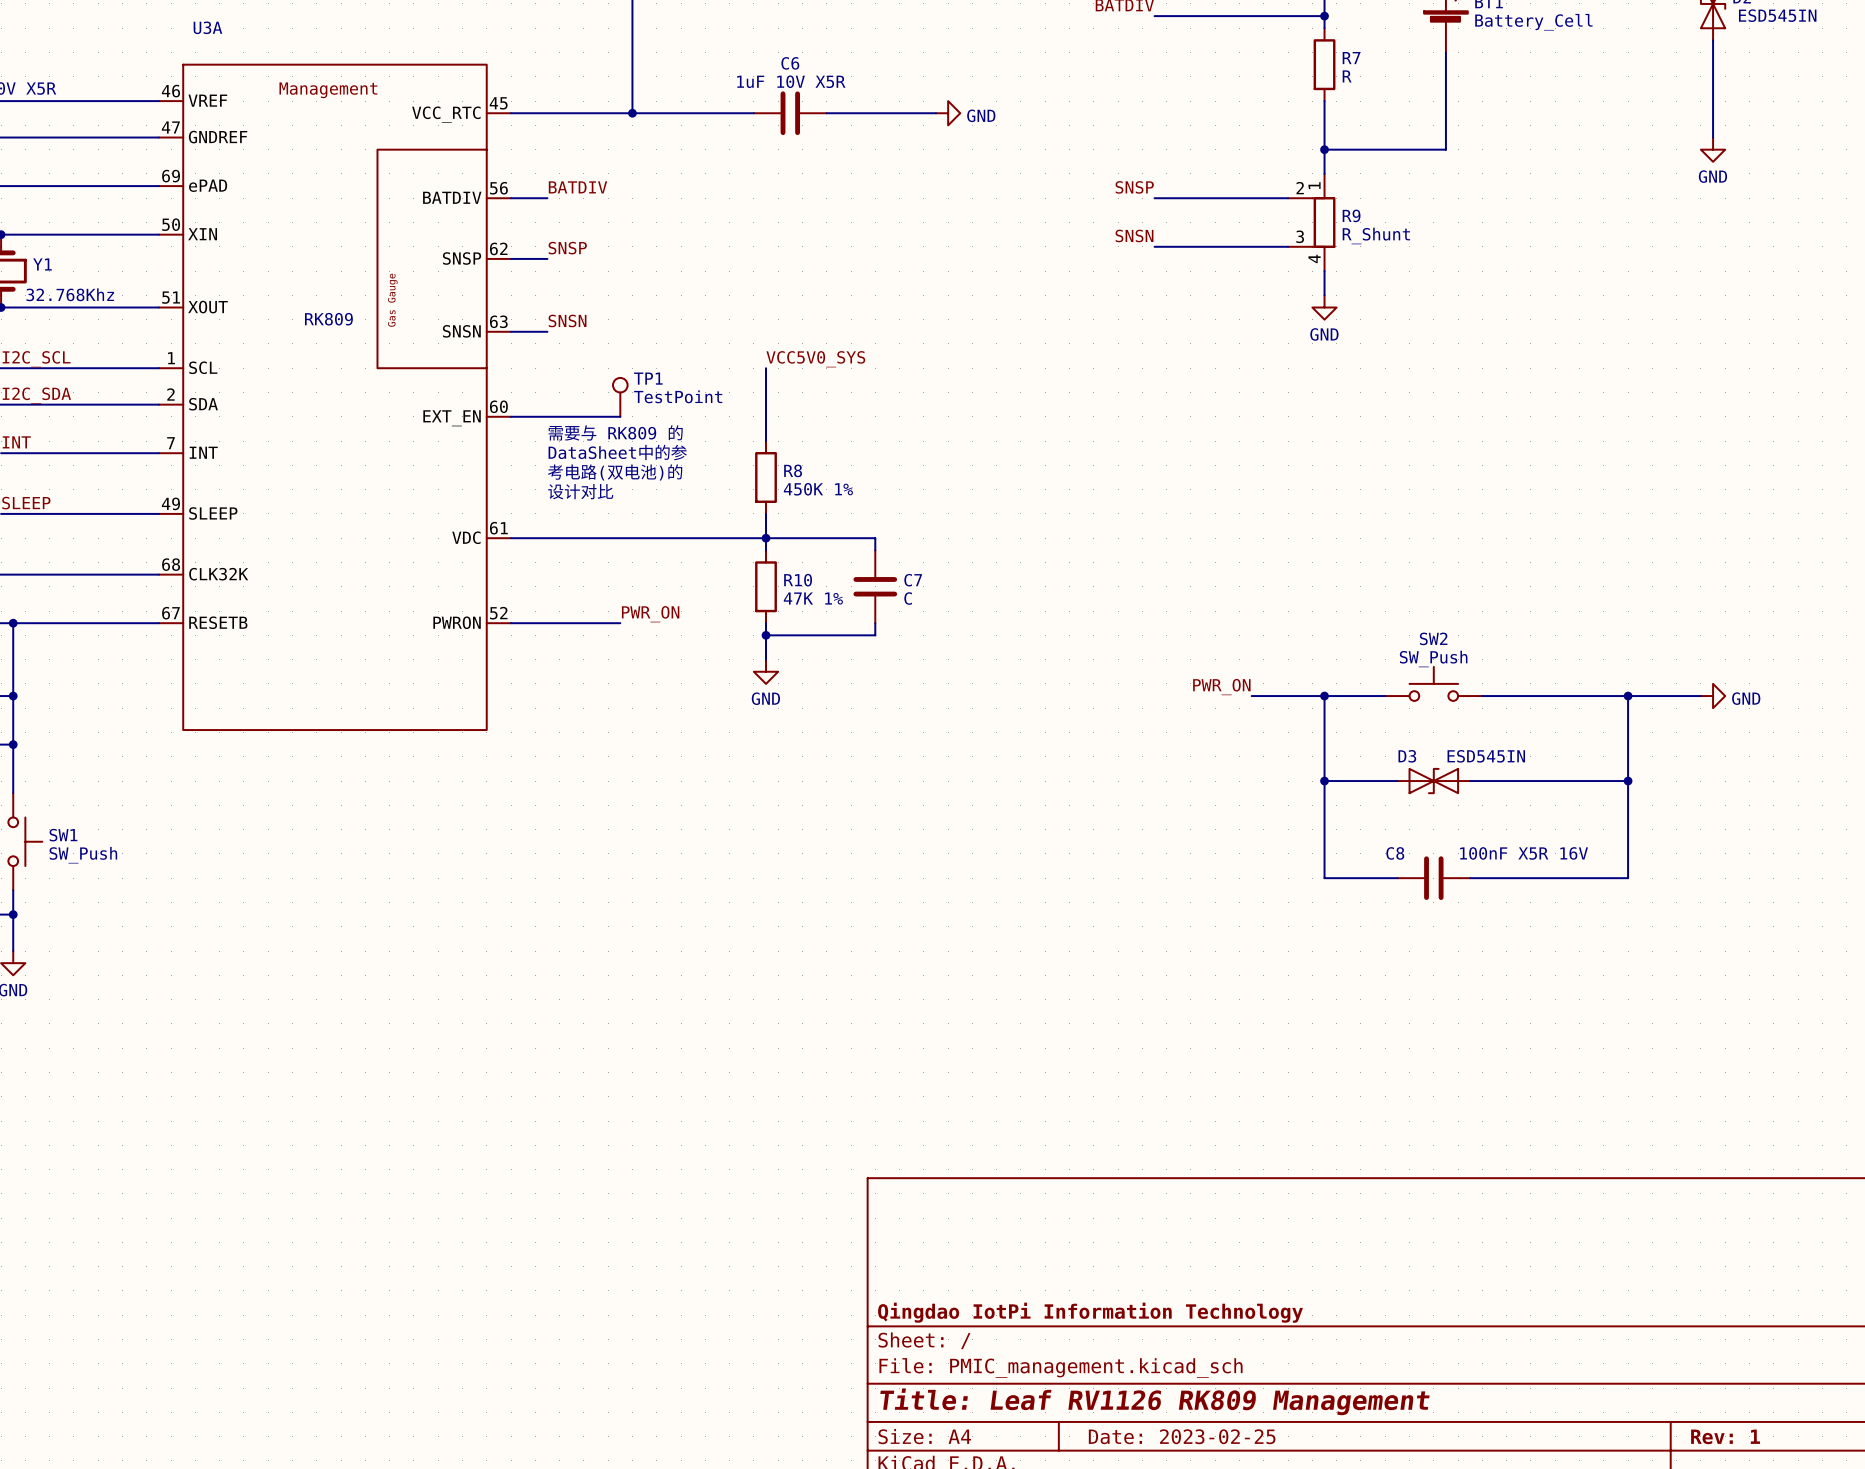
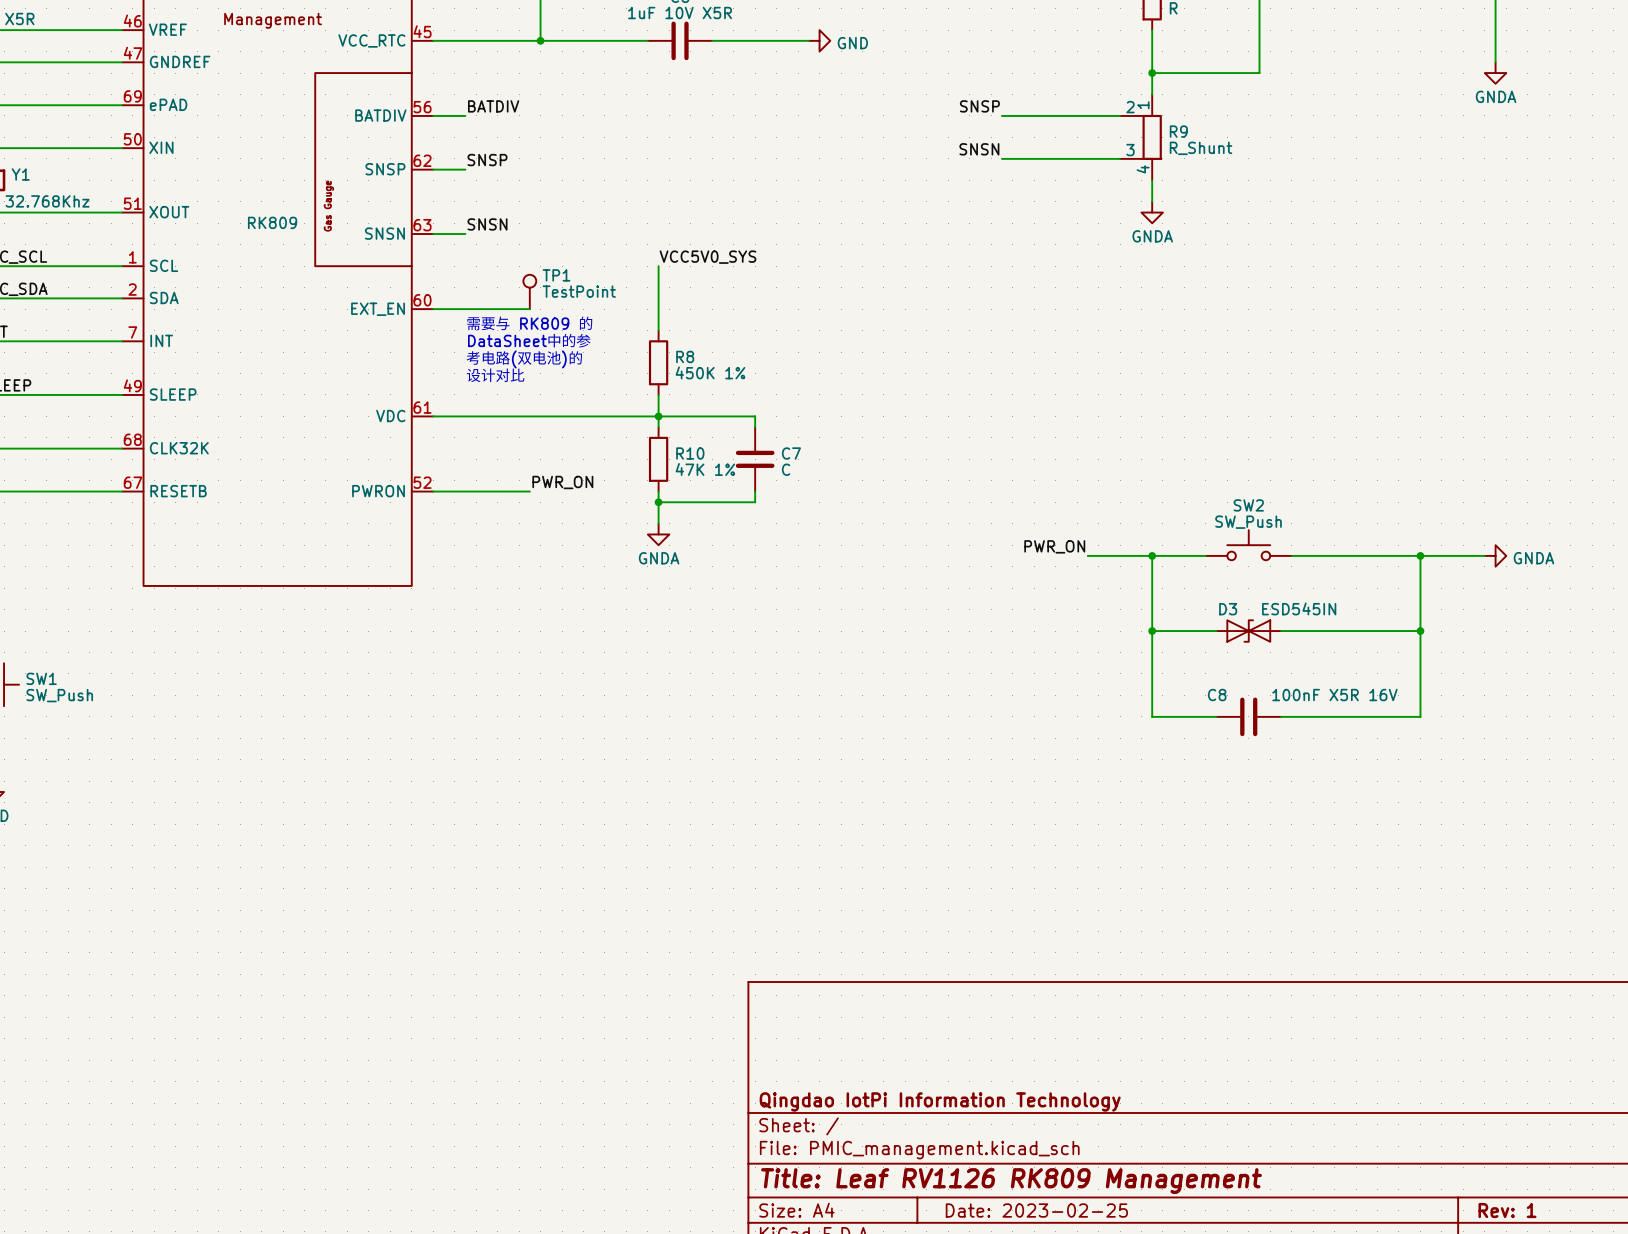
power symbol: GND (1713, 149) -> GNDA (1495, 73)
power symbol: GND (1324, 307) -> GNDA (1152, 212)
power symbol: GND (766, 671) -> GNDA (658, 534)
power symbol: GND (1713, 696) -> GNDA (1495, 555)

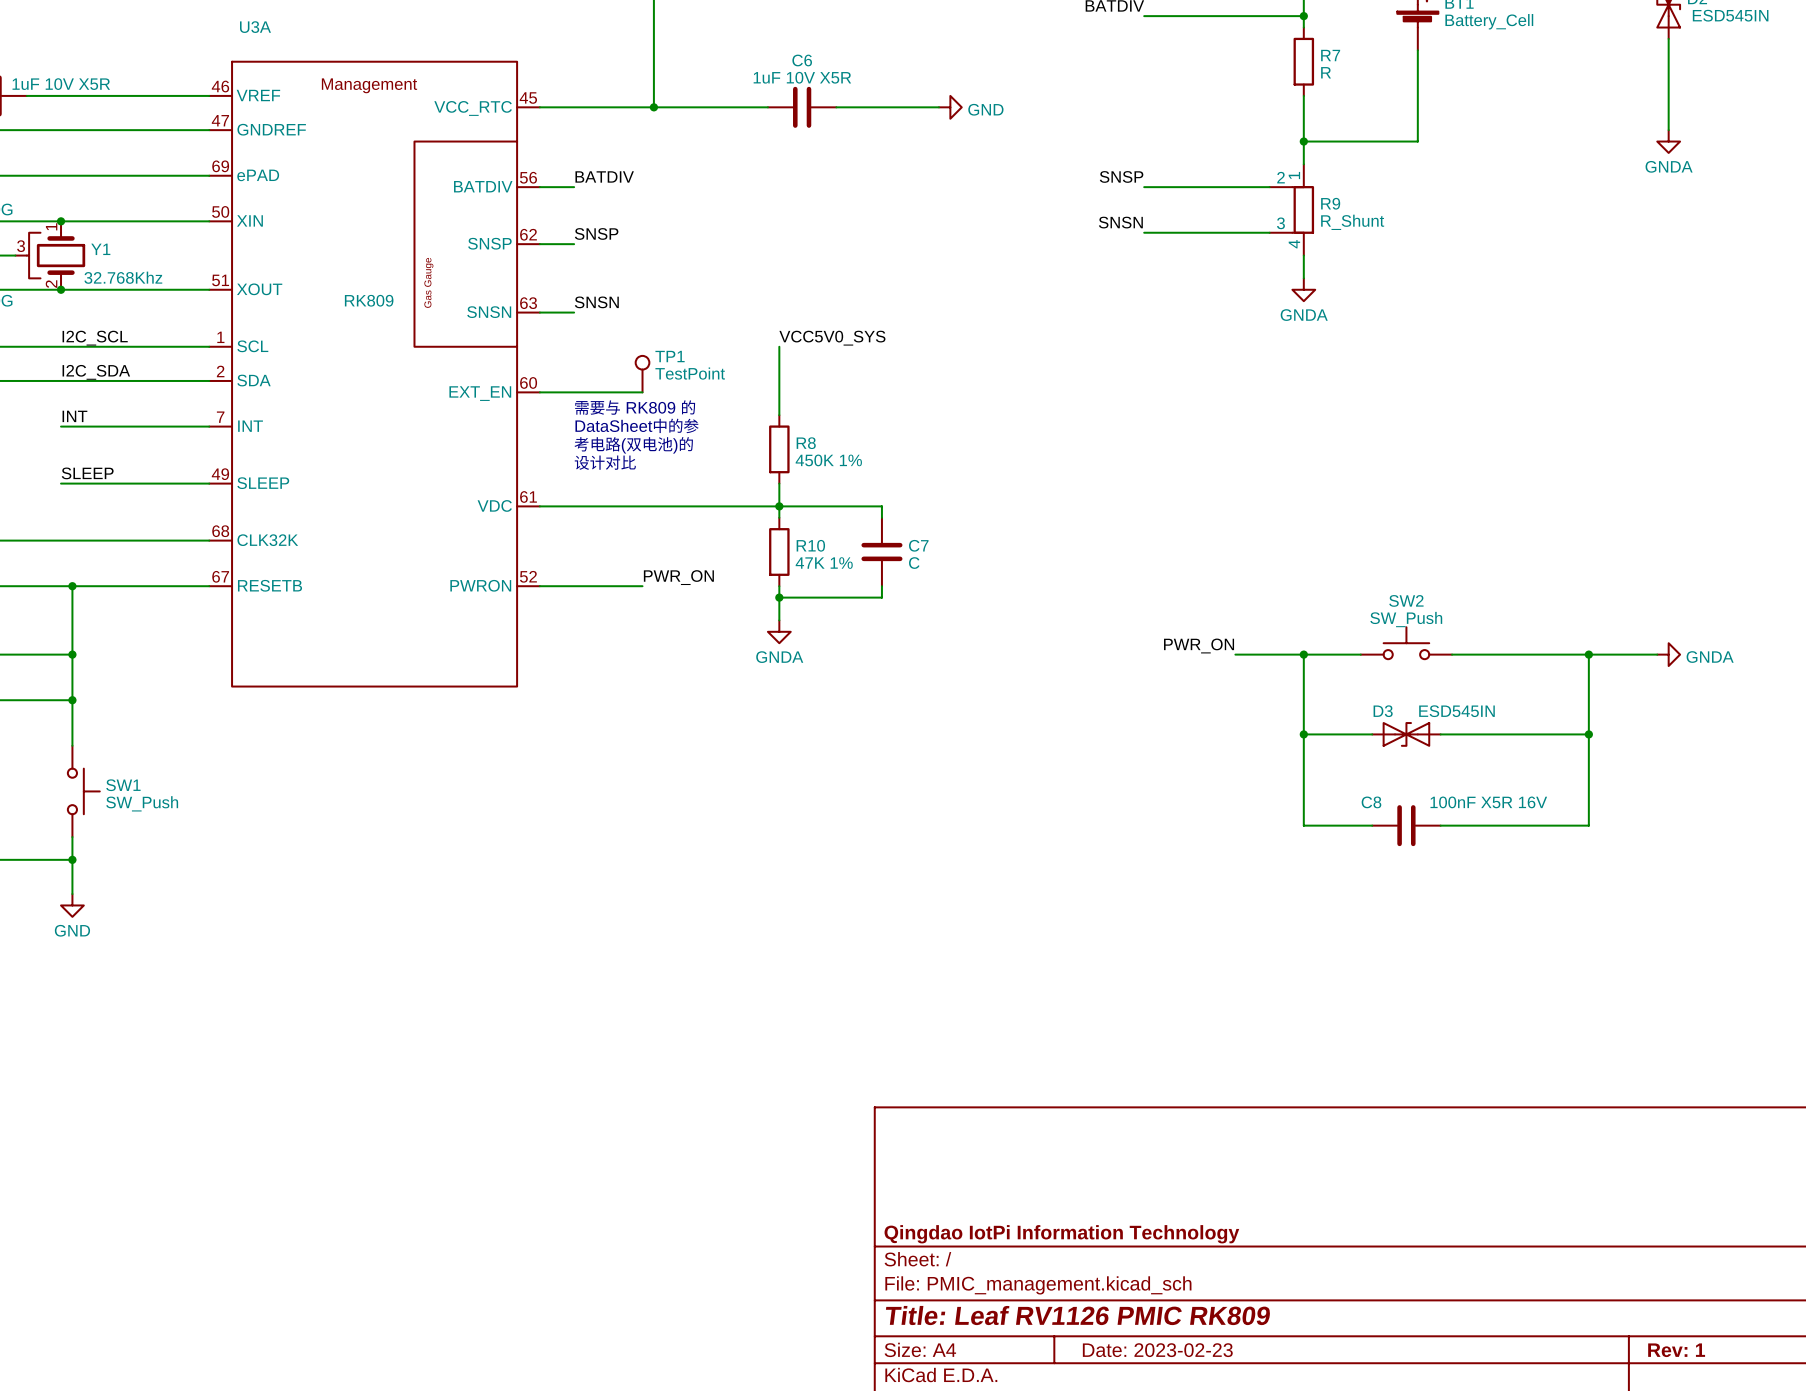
title block: Title: Leaf RV1126 RK809 Management (1011, 1181) -> Title: Leaf RV1126 PMIC RK809 (1078, 1315)
title block: Date: 2023-02-25 (1036, 1210) -> Date: 2023-02-23 (1157, 1350)

